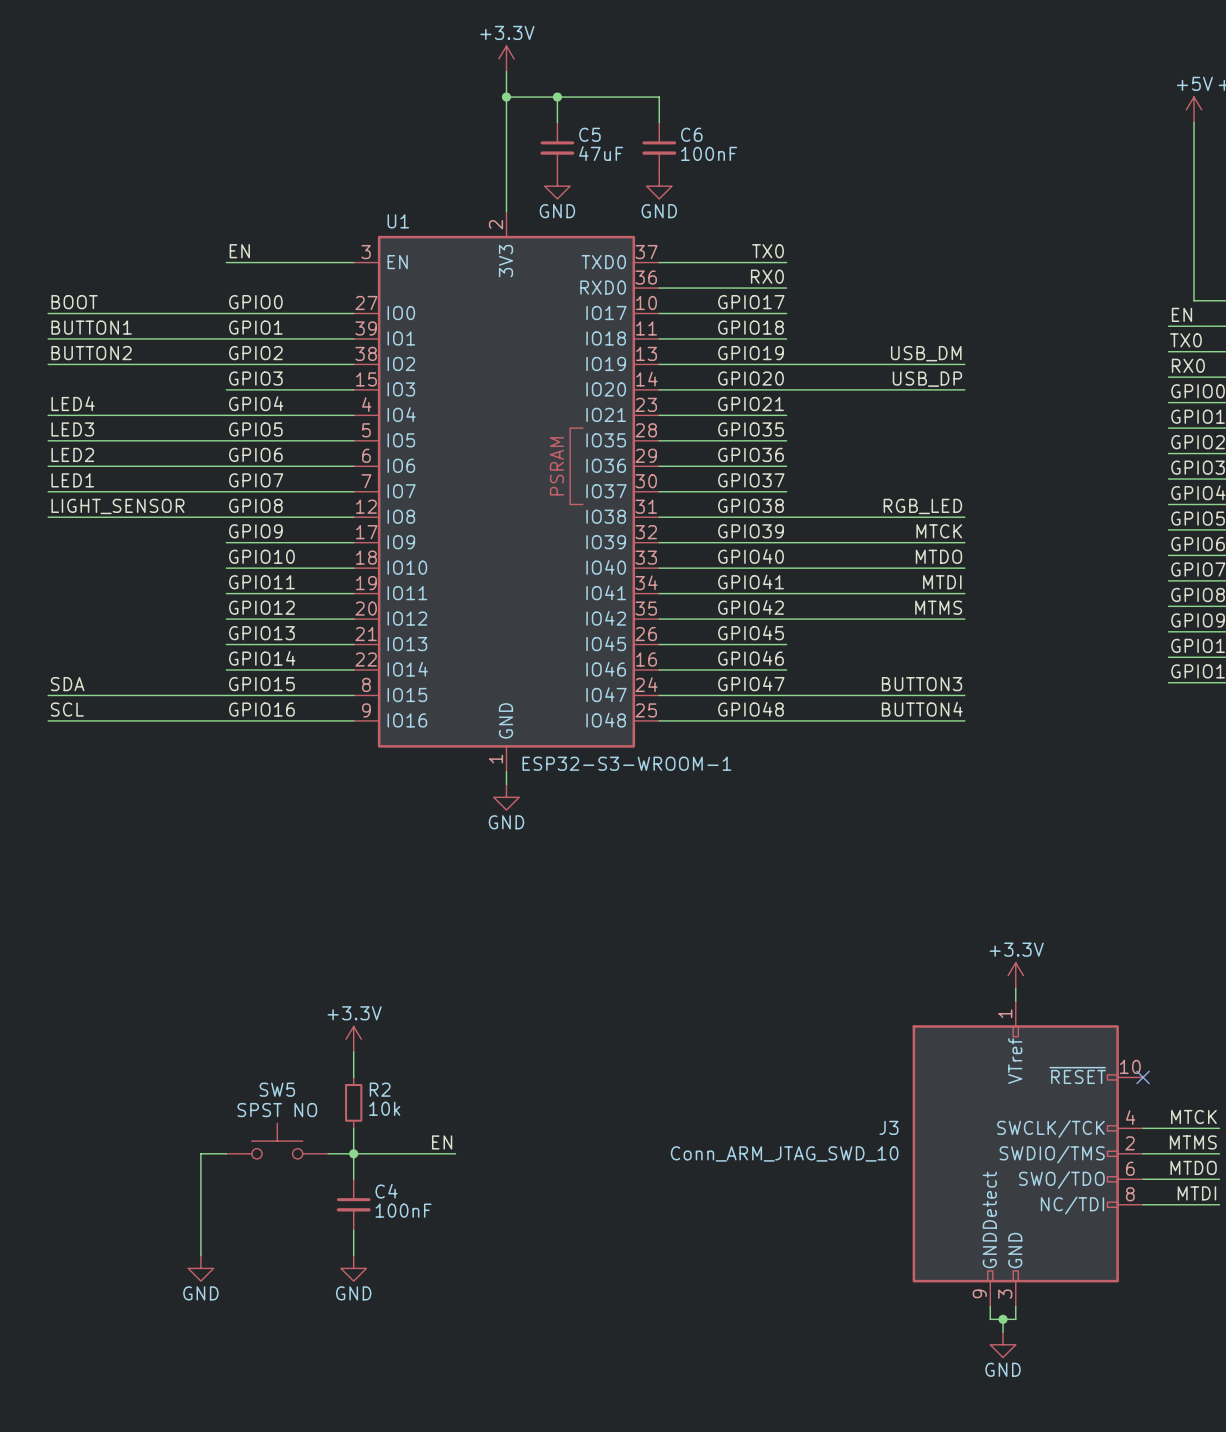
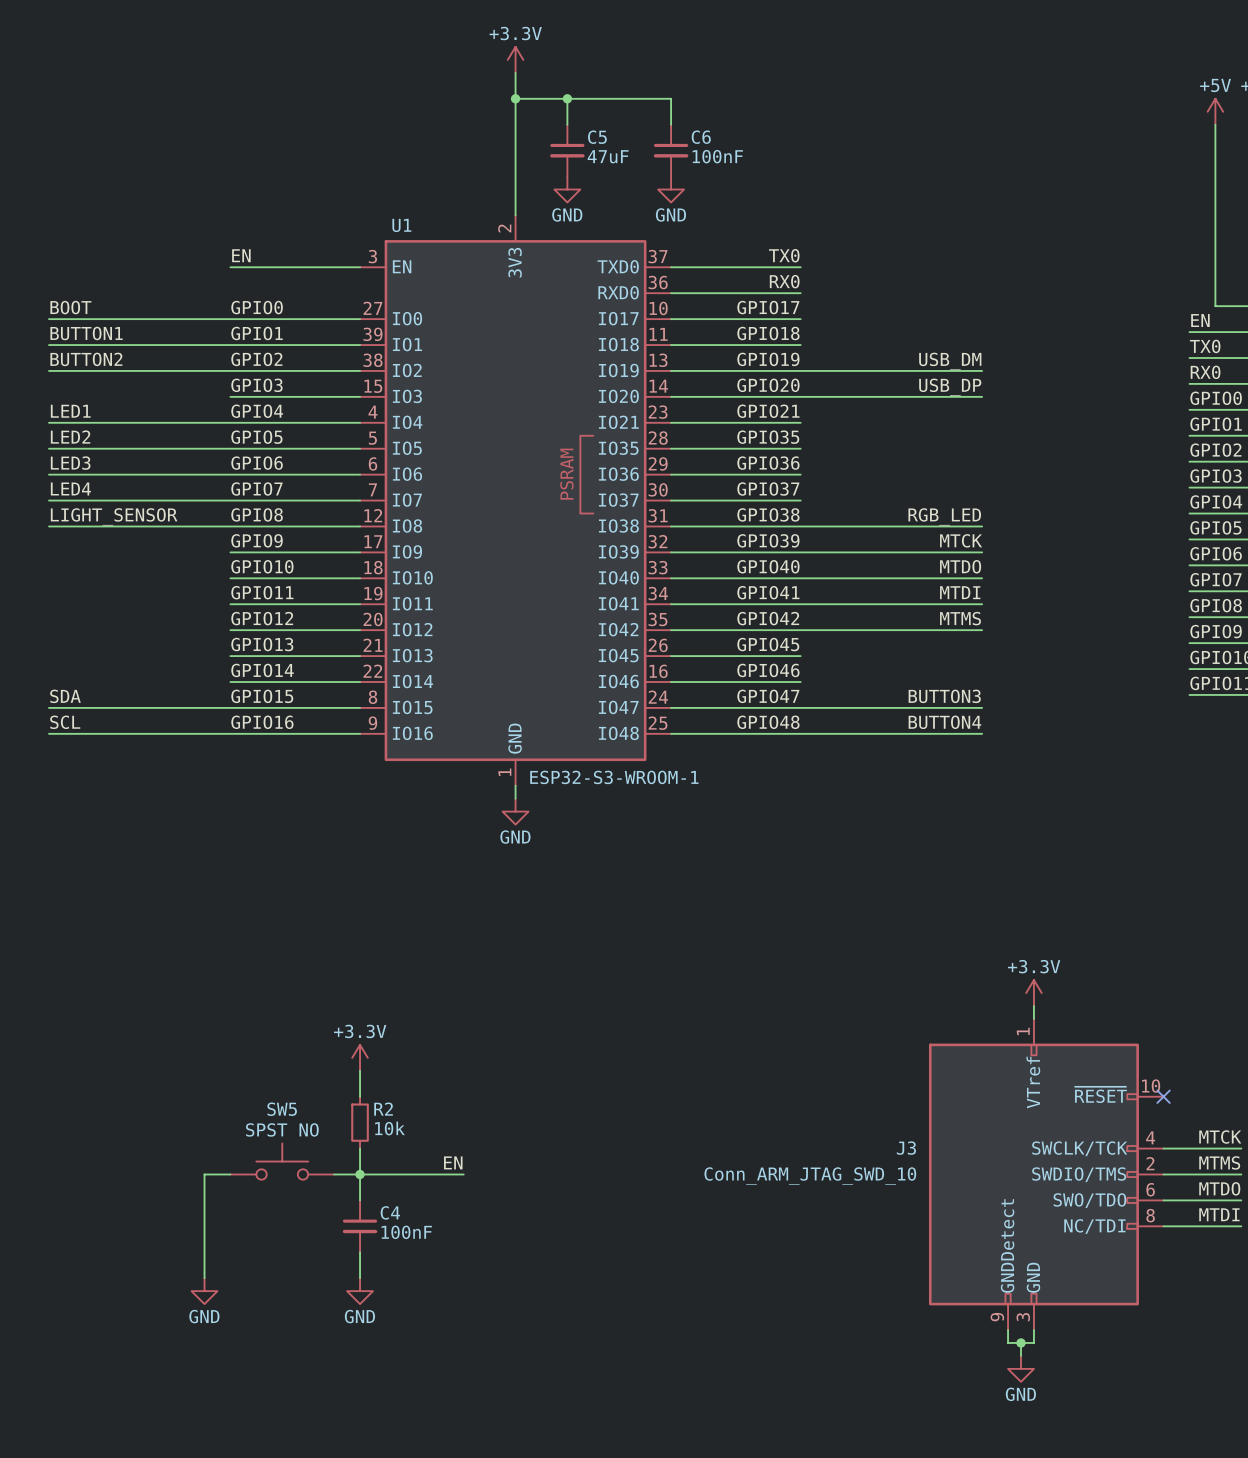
label: LED4 (73, 403) -> LED1 (70, 411)
label: LED3 (72, 429) -> LED2 (70, 437)
label: LED2 (72, 454) -> LED3 (70, 463)
label: LED1 (72, 480) -> LED4 (70, 489)

